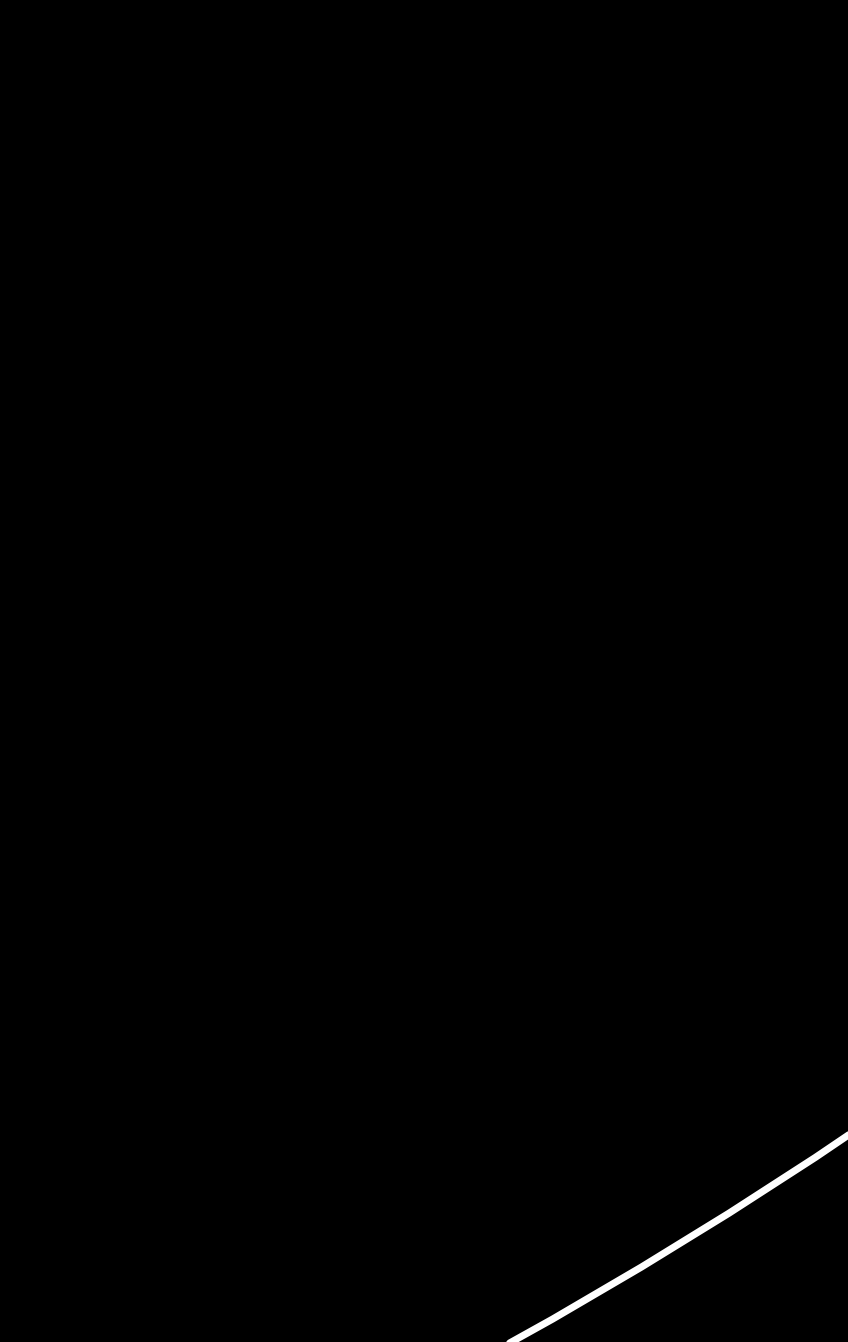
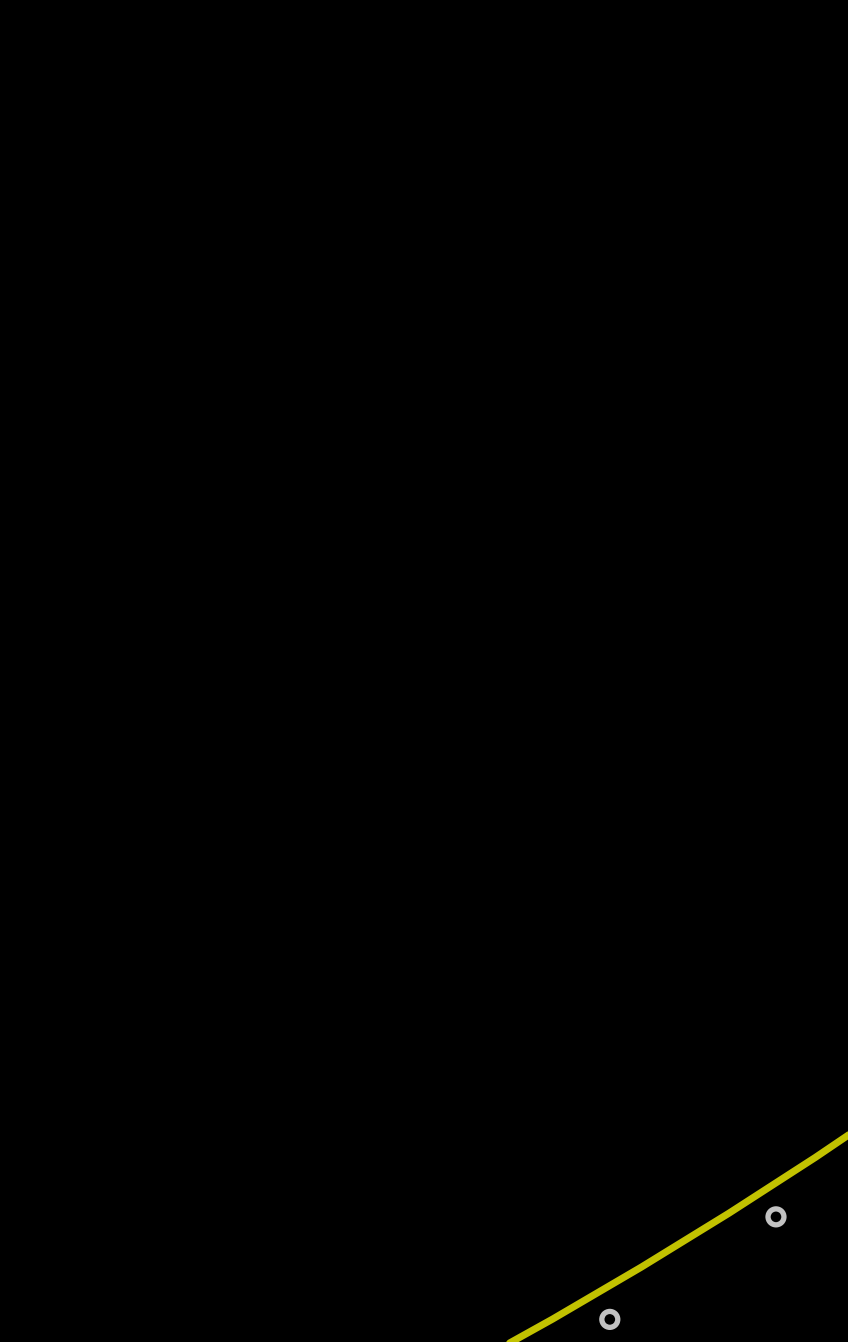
via: none -> (775, 1216)
via: none -> (609, 1319)

